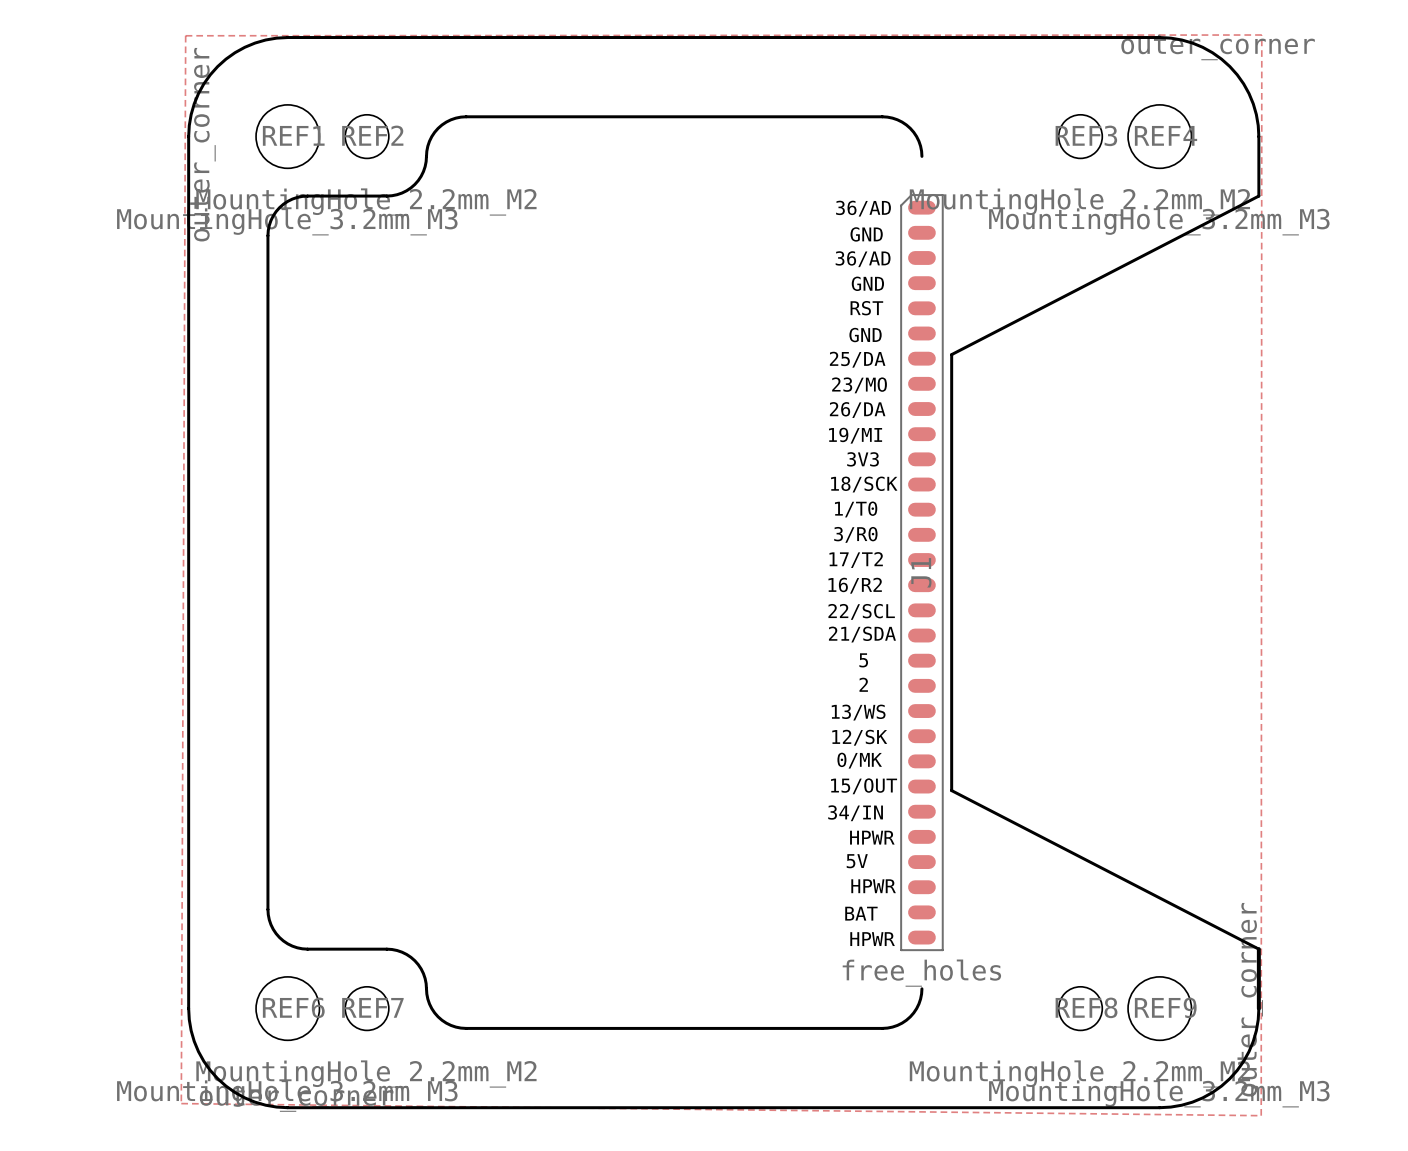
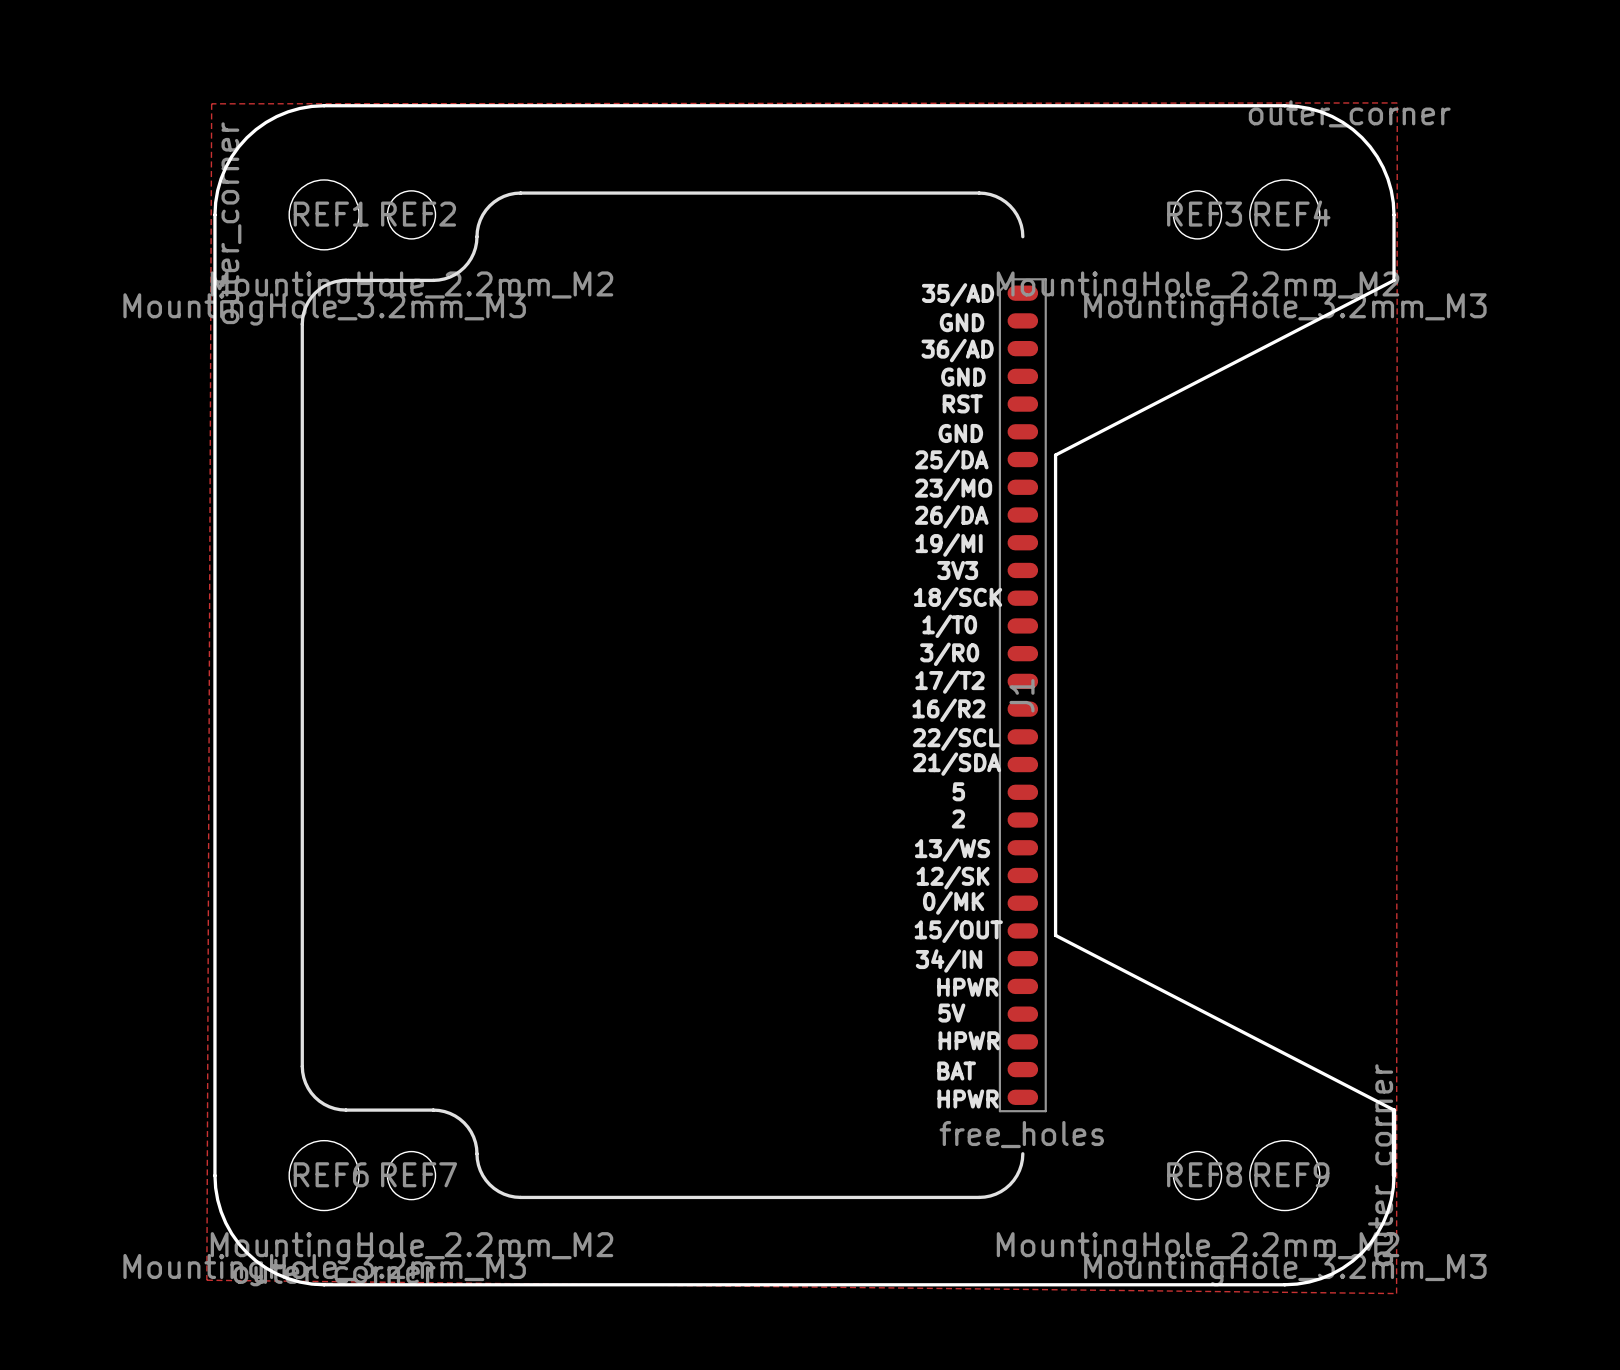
text: 36/AD (863, 208) -> 35/AD (958, 294)

